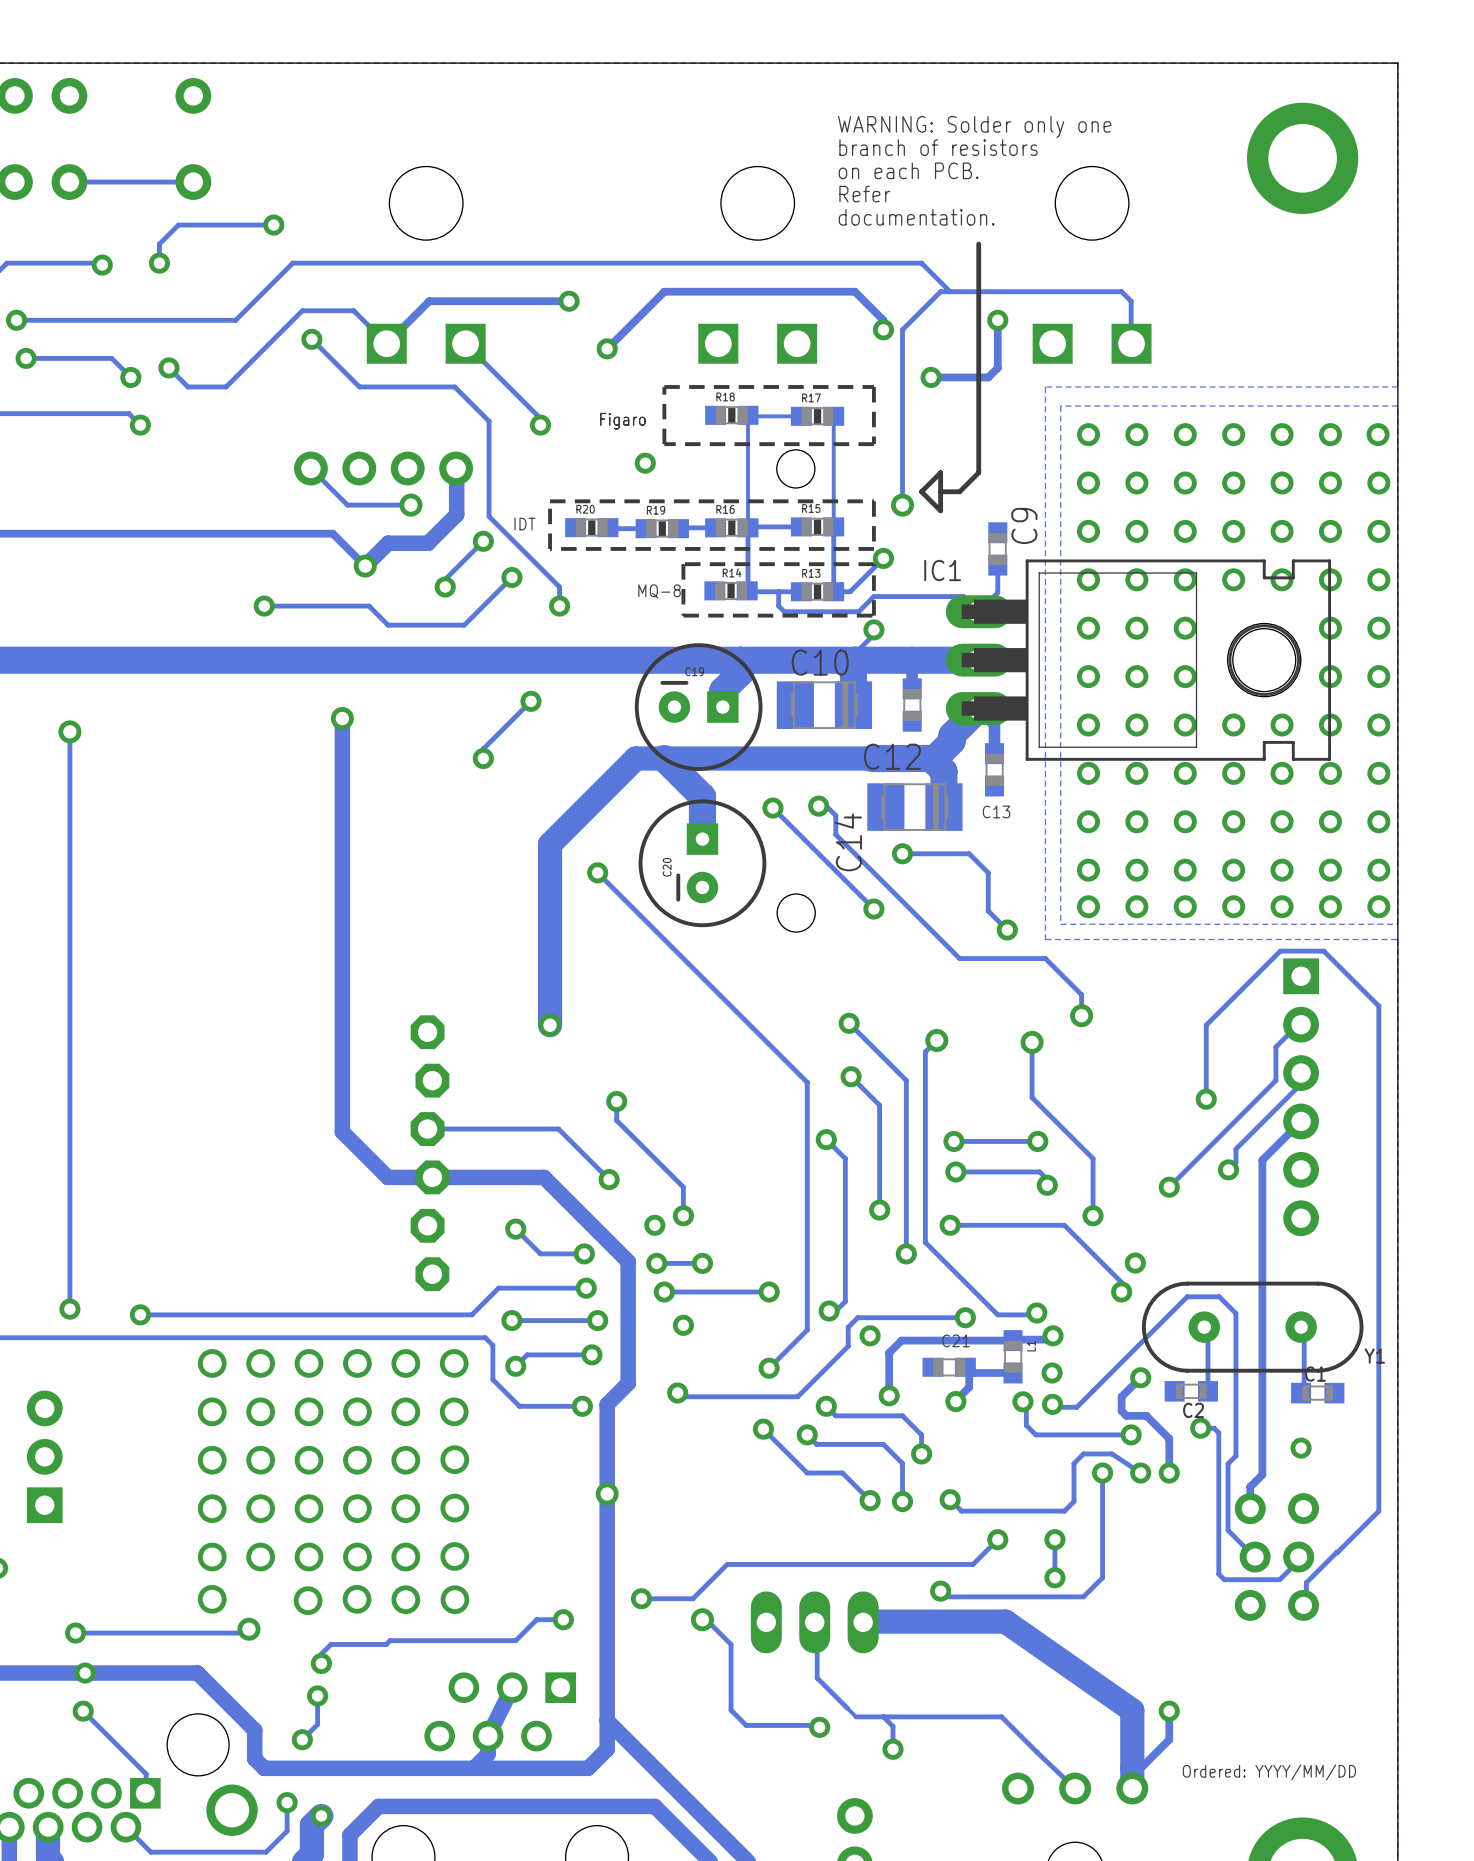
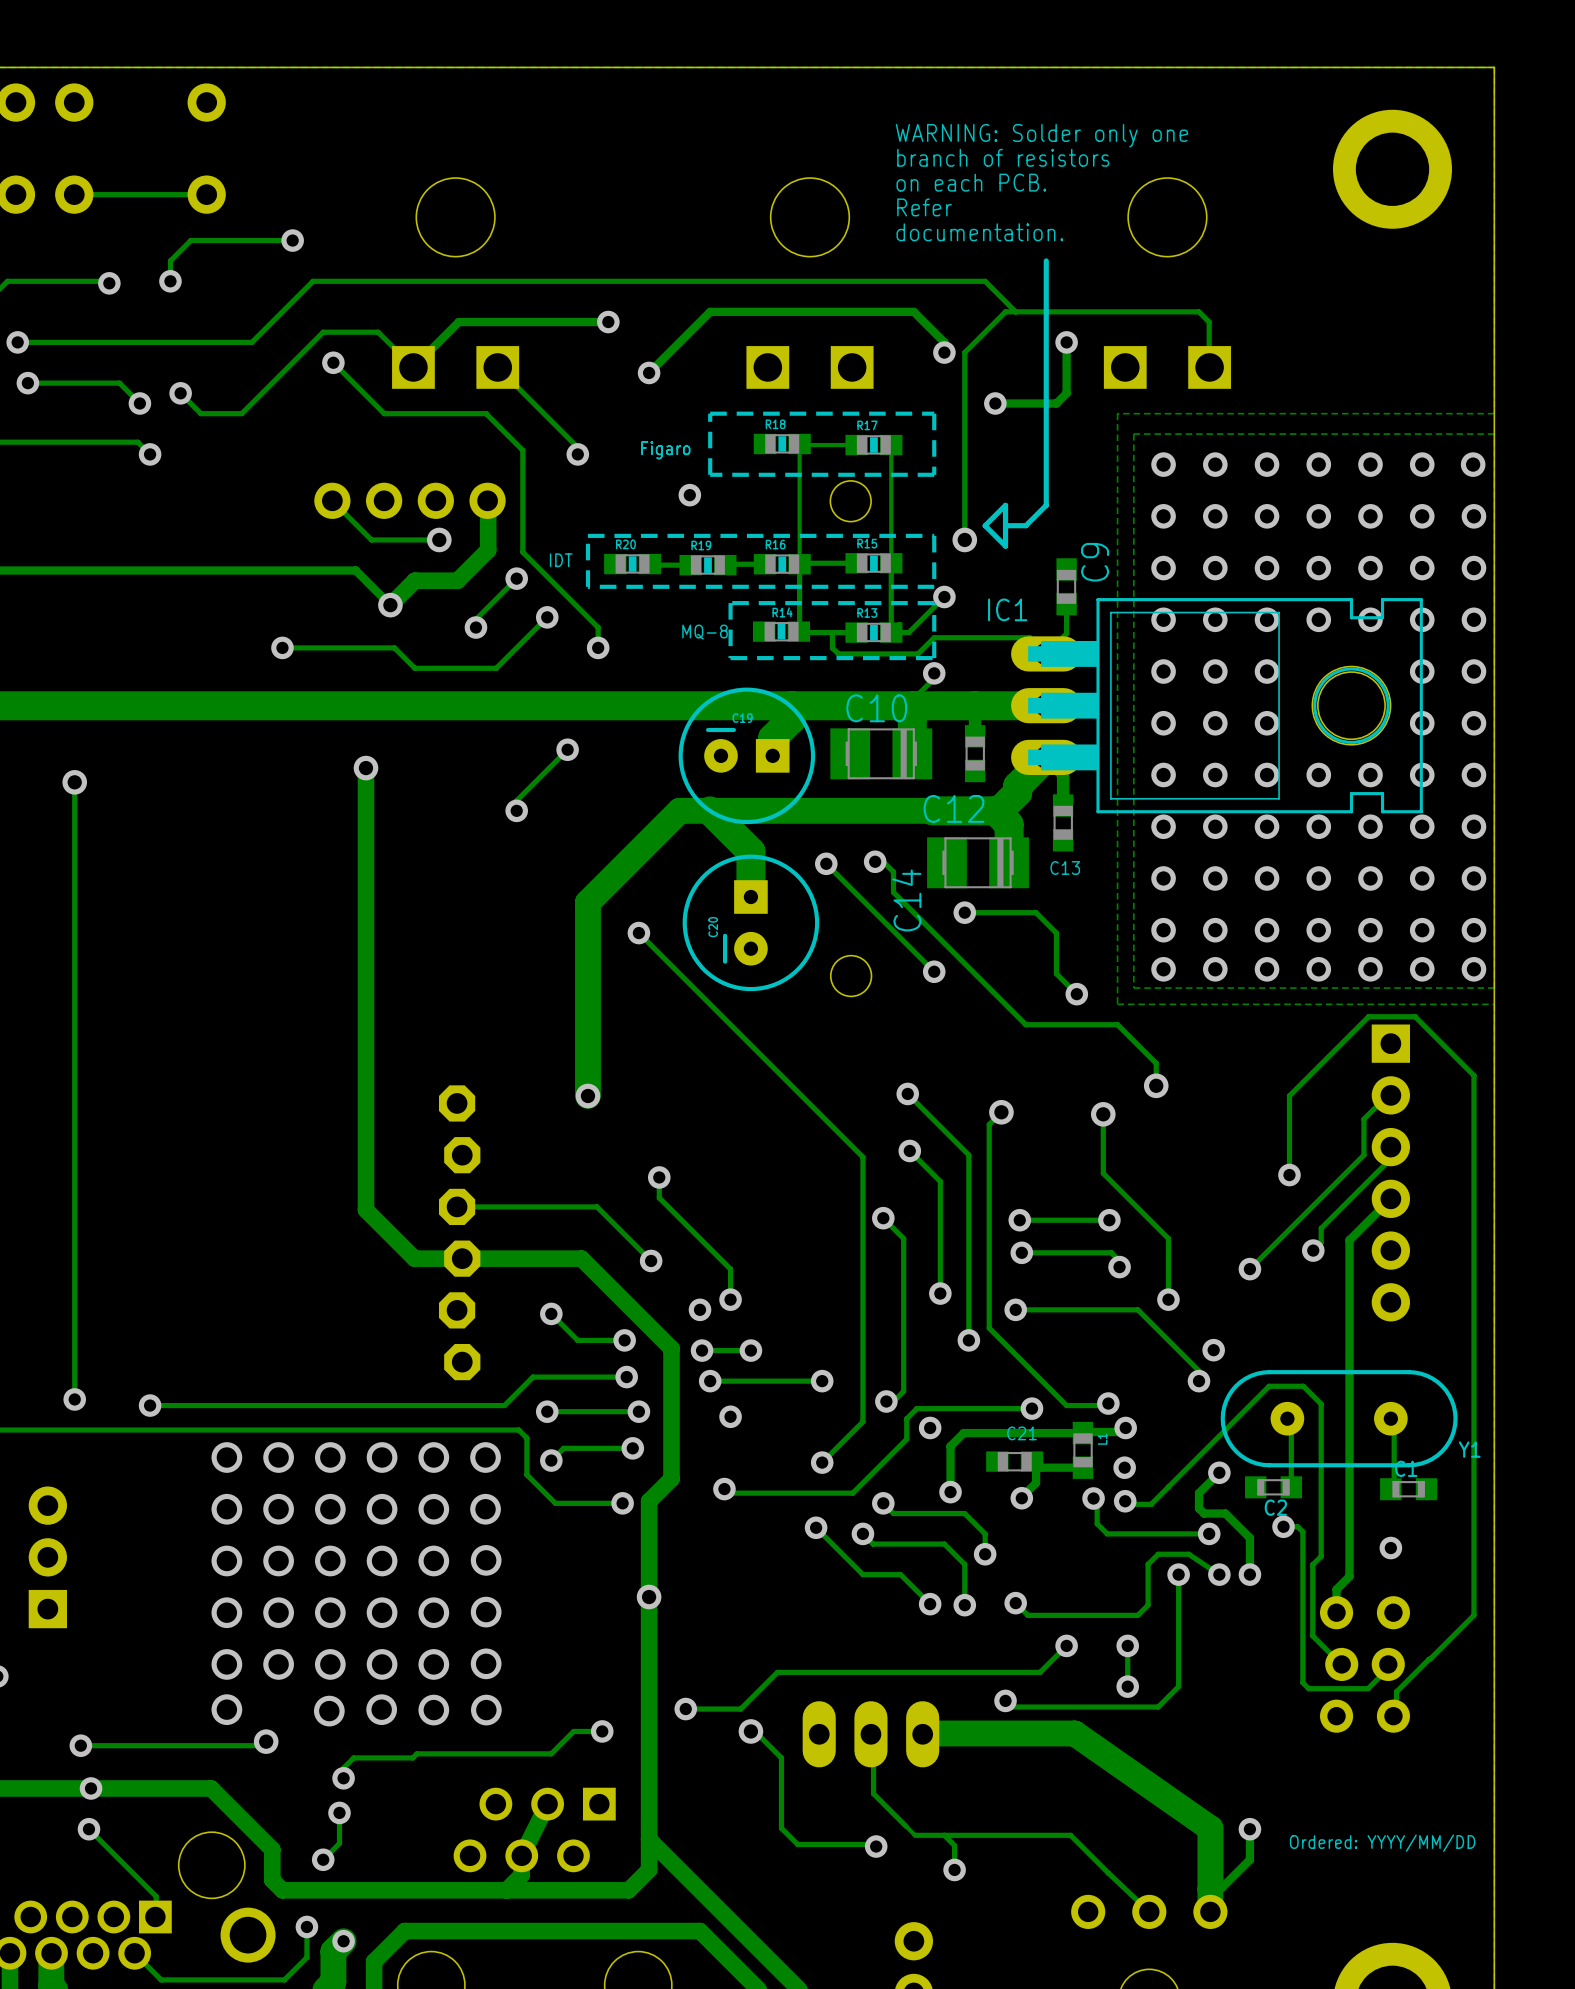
text position: Ordered: YYYY/MM/DD (1269, 1772) -> Ordered: YYYY/MM/DD (1382, 1843)

